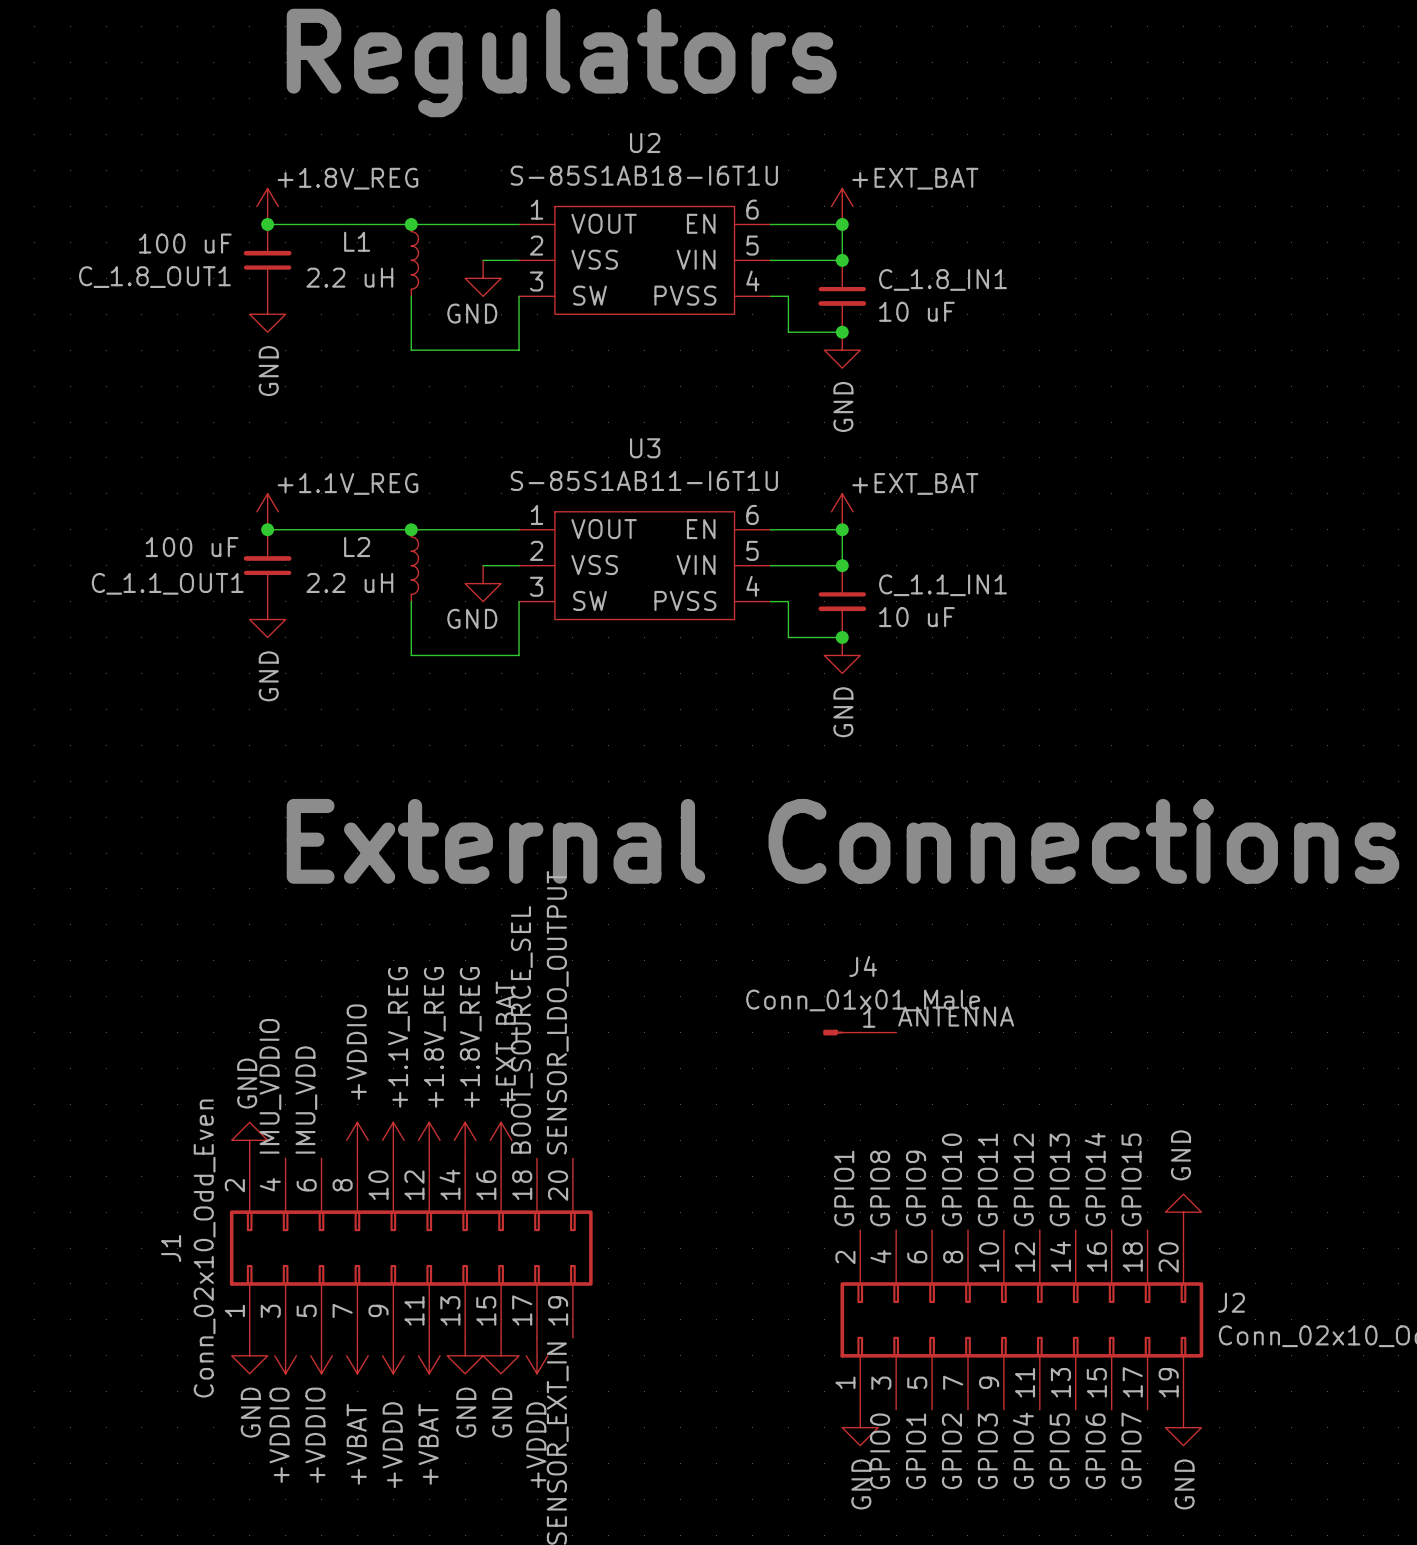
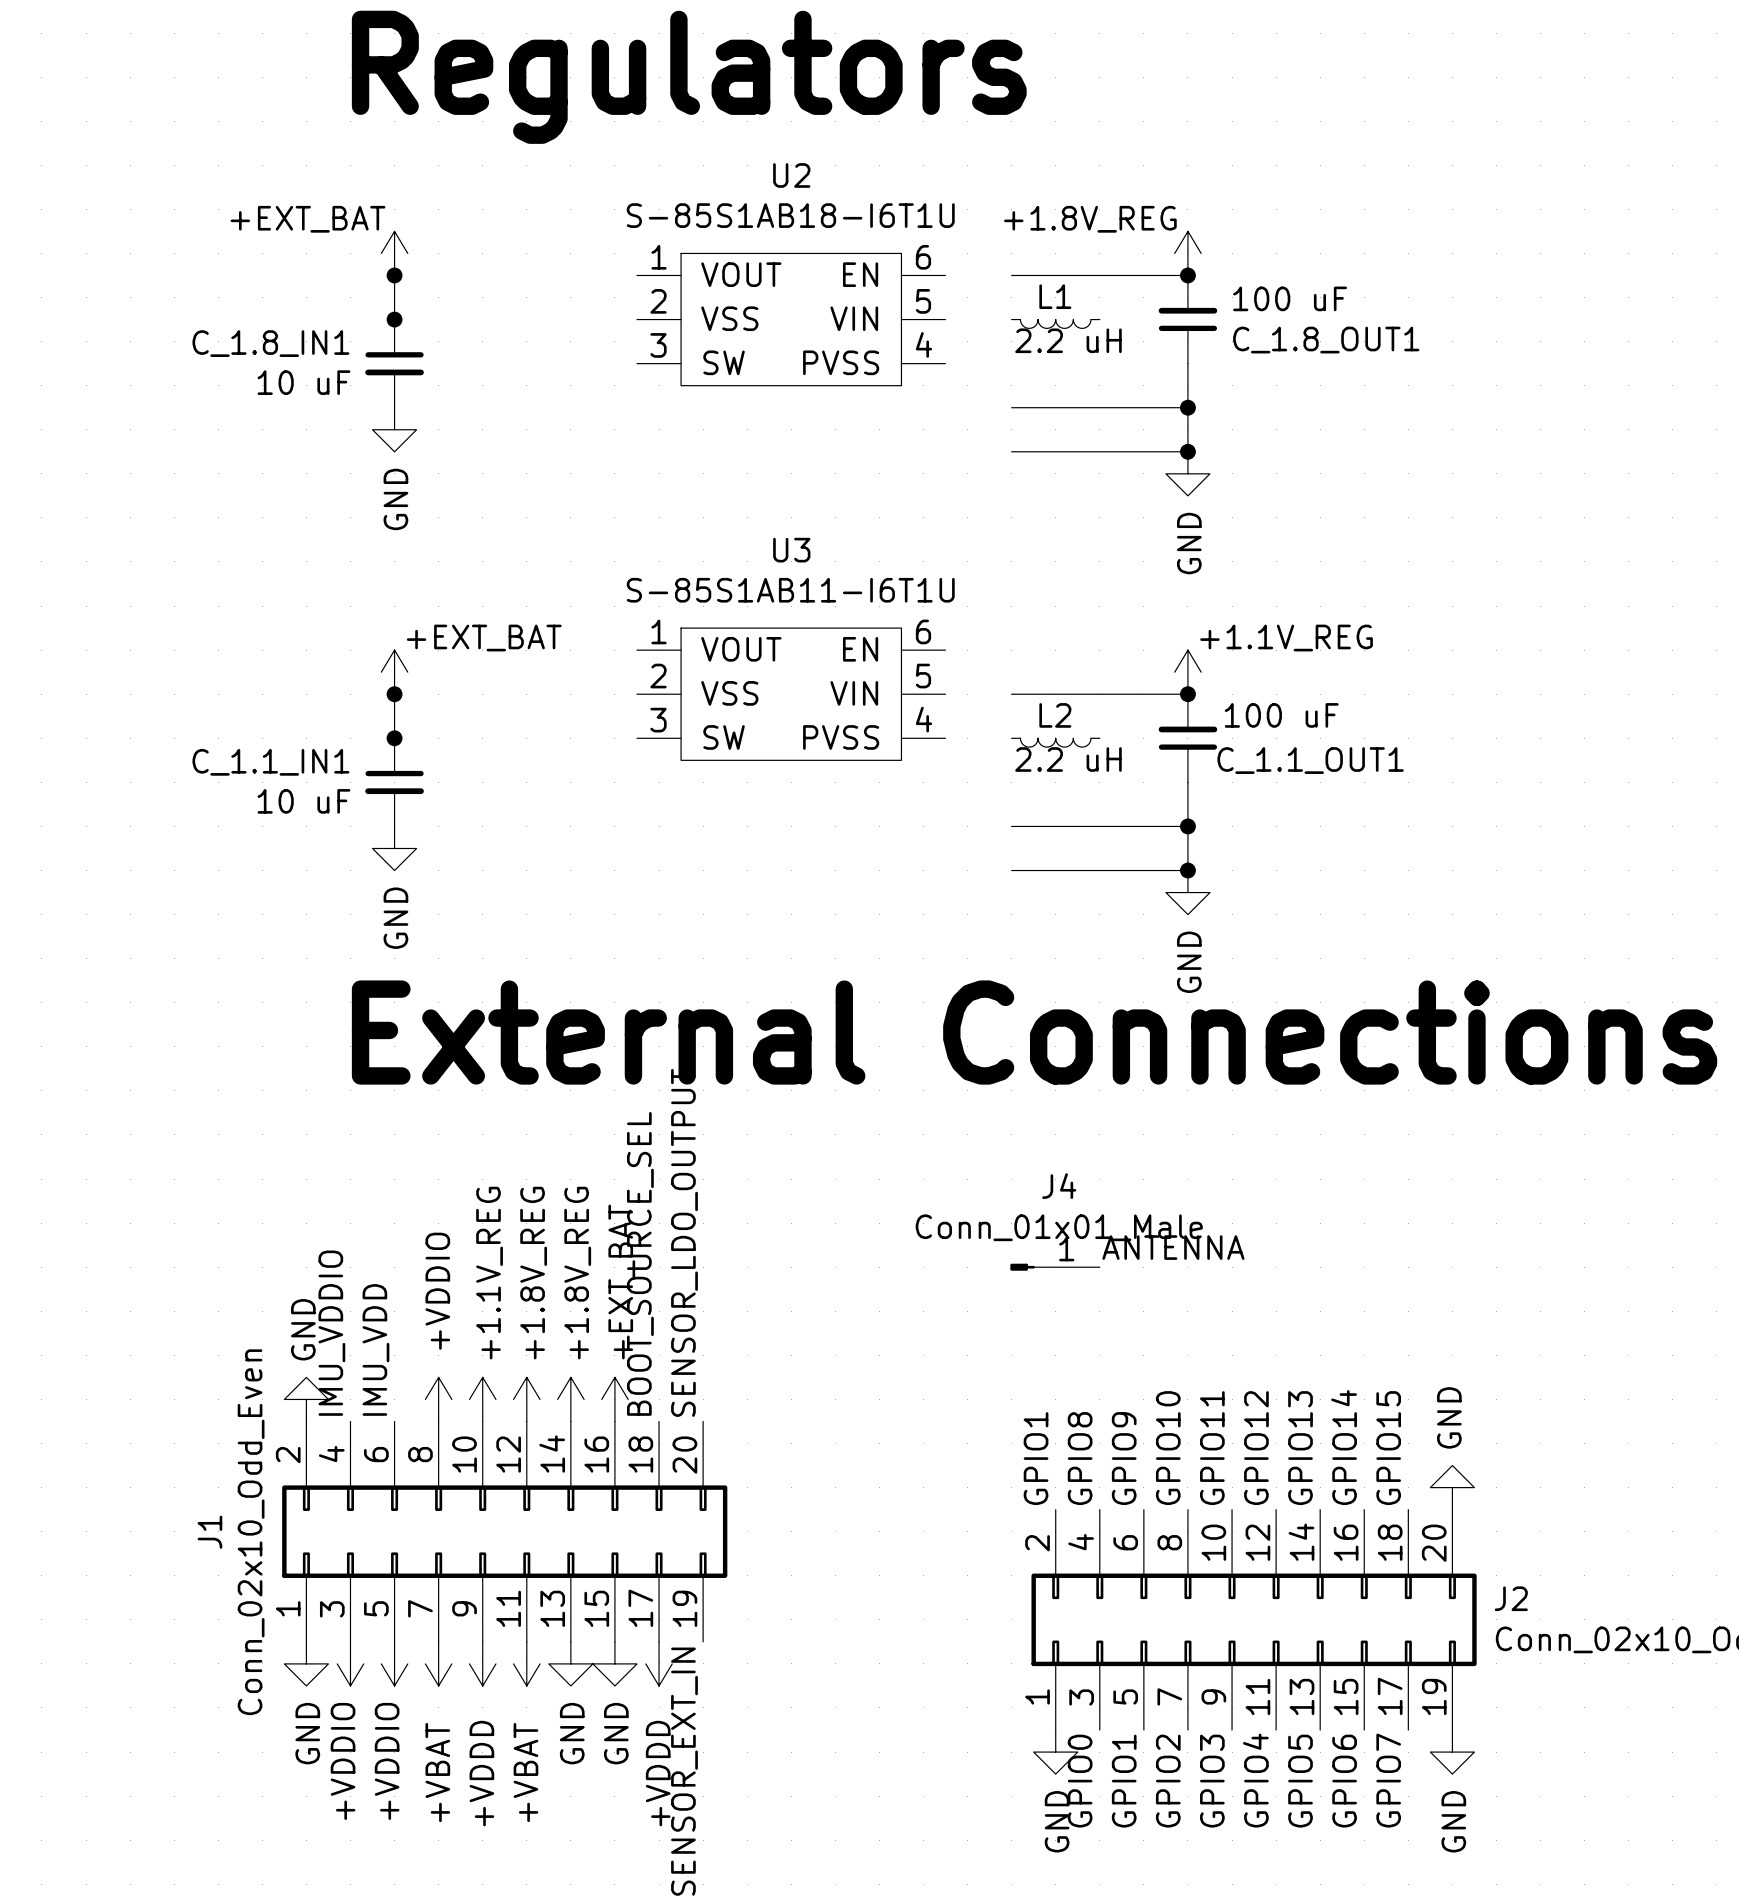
power symbol: +1.8V_REG (267, 206) -> none
power symbol: none -> +EXT_BAT (394, 253)
power symbol: +EXT_BAT (842, 206) -> none
power symbol: none -> +1.8V_REG (1187, 253)
wire: (267, 224) (519, 224) -> none
junction: (267, 224) -> none
wire: none -> (394, 275) (394, 319)
junction: none -> (394, 275)
junction: (411, 224) -> none
wire: (770, 224) (824, 224) -> none
wire: (842, 224) (842, 260) (770, 260) -> (1033, 275) (1187, 275)
junction: (842, 224) -> none
junction: none -> (1187, 275)
L1 name position: L1 (357, 241) -> L1 (1055, 296)
C_1.8_OUT1 value position: 100 uF (185, 243) -> 100 uF (1290, 298)
C_1.8_OUT1 position: (267, 260) -> (1187, 319)
junction: none -> (394, 319)
L1 rotation: 0° (414, 260) -> 90° clockwise (1055, 323)
L1 position: (414, 260) -> (1055, 323)
wire: (483, 260) (519, 260) -> none
junction: (842, 260) -> none
C_1.8_OUT1 name position: C_1.8_OUT1 (154, 277) -> C_1.8_OUT1 (1326, 340)
L1 value position: 2.2 uH (349, 277) -> 2.2 uH (1068, 340)
power symbol: GND (483, 278) -> none
C_1.8_IN1 name position: C_1.8_IN1 (943, 279) -> C_1.8_IN1 (270, 343)
wire: (411, 296) (411, 350) (519, 350) (519, 296) -> none
wire: (770, 296) (788, 296) (788, 332) (824, 332) -> none
C_1.8_IN1 position: (842, 296) -> (394, 363)
wire: none -> (1187, 363) (1187, 451) (1011, 451)
C_1.8_IN1 value position: 10 uF (916, 311) -> 10 uF (303, 382)
power symbol position: GND (267, 314) -> GND (394, 429)
wire: none -> (1033, 407) (1187, 407)
junction: (842, 332) -> none
junction: none -> (1187, 407)
power symbol position: GND (842, 350) -> GND (1187, 473)
junction: none -> (1187, 451)
power symbol: +1.1V_REG (267, 511) -> none
power symbol: +EXT_BAT (842, 511) -> none
wire: (267, 529) (519, 529) -> none
junction: (267, 529) -> none
junction: (411, 529) -> none
wire: (770, 529) (842, 529) (842, 565) -> (1187, 694) (1033, 694)
junction: (842, 529) -> none
C_1.1_OUT1 value position: 100 uF (192, 547) -> 100 uF (1281, 715)
power symbol: none -> +EXT_BAT (394, 672)
L2 name position: L2 (357, 547) -> L2 (1055, 715)
power symbol: none -> +1.1V_REG (1187, 672)
C_1.1_OUT1 position: (267, 565) -> (1187, 738)
wire: none -> (394, 694) (394, 738)
junction: none -> (394, 694)
L2 rotation: 0° (414, 565) -> 90° clockwise (1055, 742)
L2 position: (414, 565) -> (1055, 742)
wire: (483, 565) (519, 565) -> none
wire: (770, 565) (824, 565) -> none
junction: (842, 565) -> none
junction: none -> (1187, 694)
L2 value position: 2.2 uH (349, 582) -> 2.2 uH (1068, 759)
C_1.1_OUT1 name position: C_1.1_OUT1 (167, 583) -> C_1.1_OUT1 (1310, 760)
power symbol: GND (483, 583) -> none
C_1.1_IN1 name position: C_1.1_IN1 (943, 585) -> C_1.1_IN1 (270, 762)
junction: none -> (394, 738)
wire: (411, 601) (411, 655) (519, 655) (519, 601) -> none
wire: (770, 601) (788, 601) (788, 637) (842, 637) -> none
C_1.1_IN1 position: (842, 601) -> (394, 782)
C_1.1_IN1 value position: 10 uF (916, 617) -> 10 uF (303, 801)
power symbol position: GND (267, 619) -> GND (394, 848)
junction: (842, 637) -> none
wire: none -> (1187, 782) (1187, 870) (1011, 870)
power symbol position: GND (842, 655) -> GND (1187, 892)
wire: none -> (1011, 826) (1187, 826)
junction: none -> (1187, 826)
junction: none -> (1187, 870)

